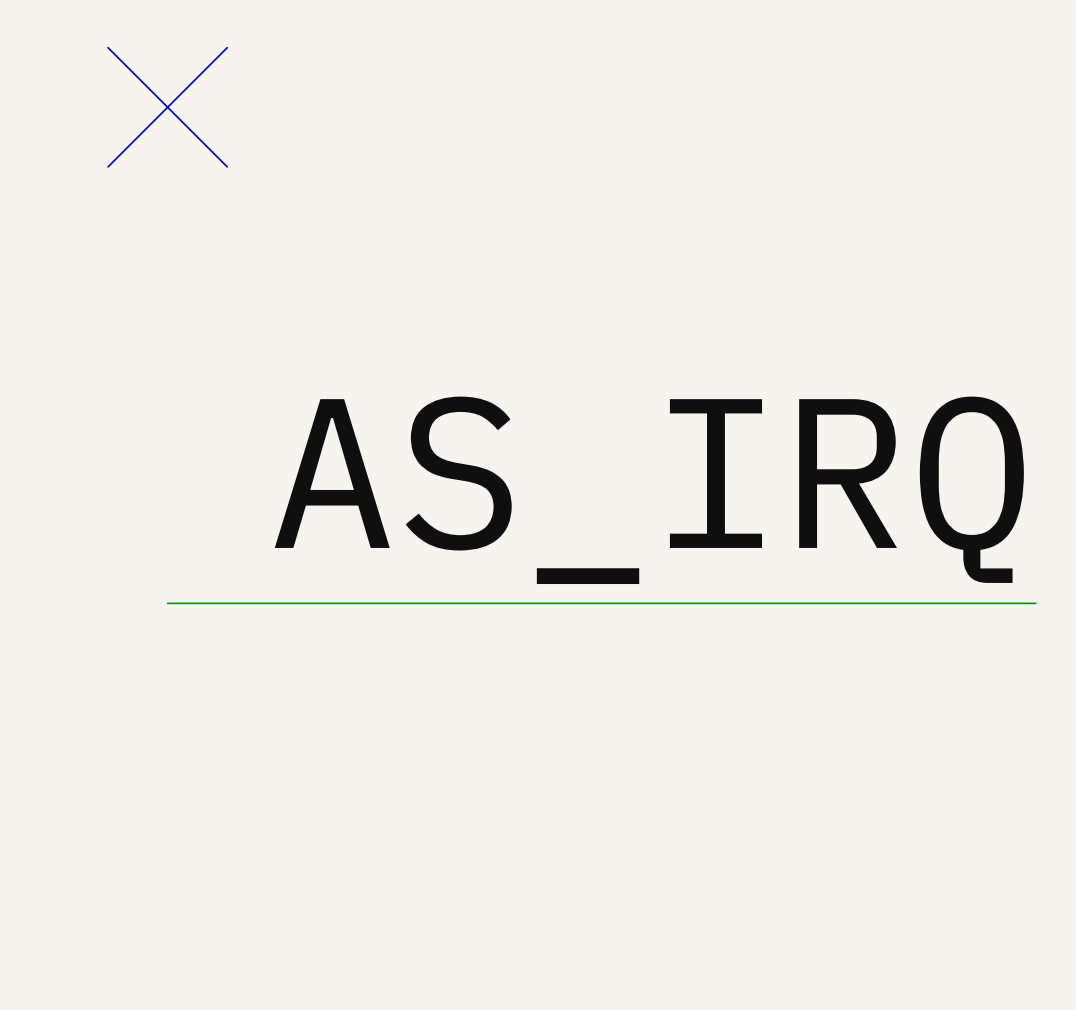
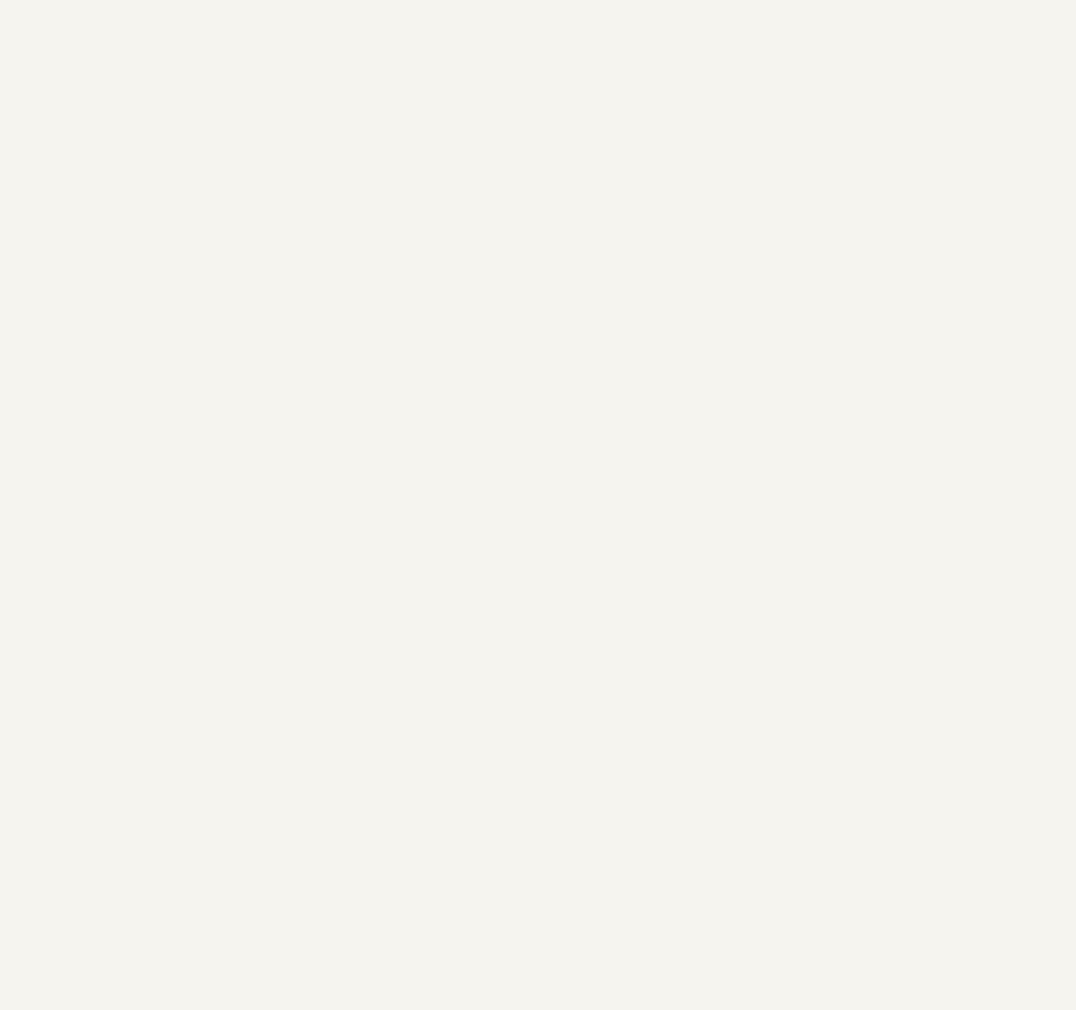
no-connect mark: (167, 107) -> none
label: AS_IRQ (649, 490) -> none
wire: (167, 603) (1035, 603) -> none

